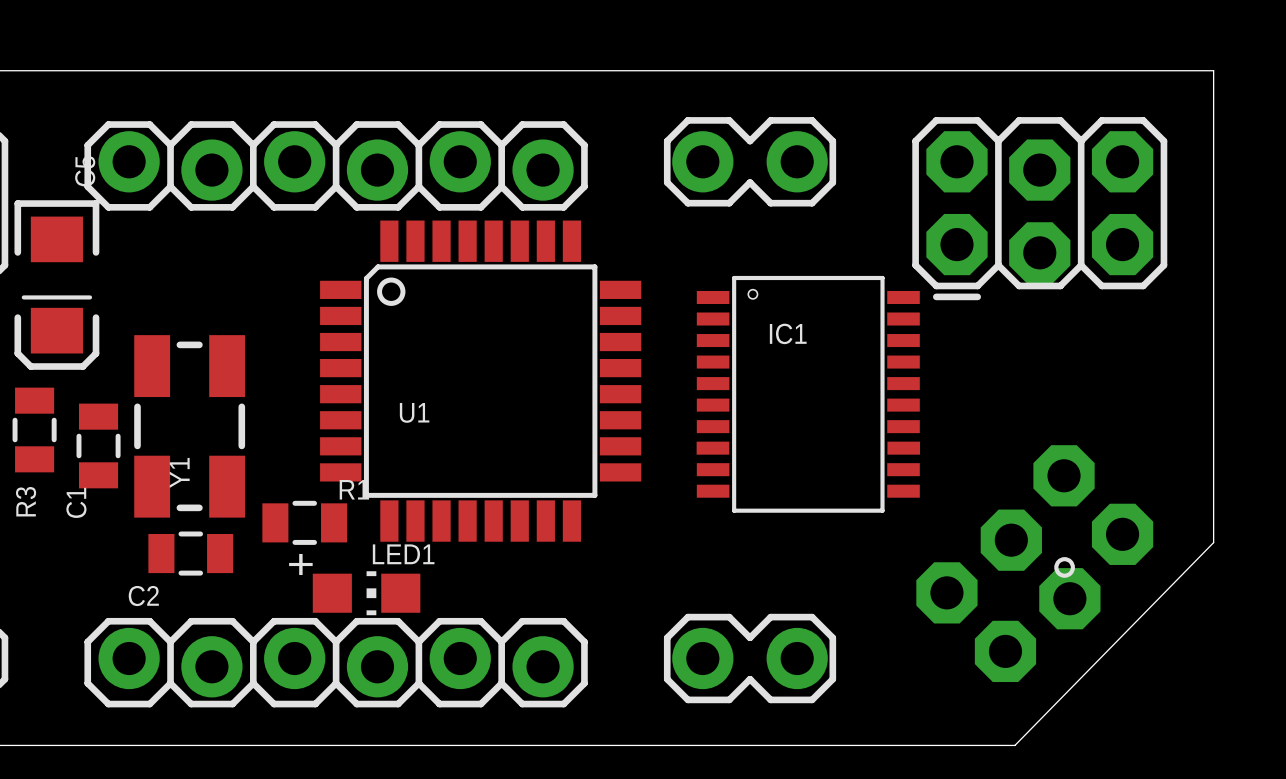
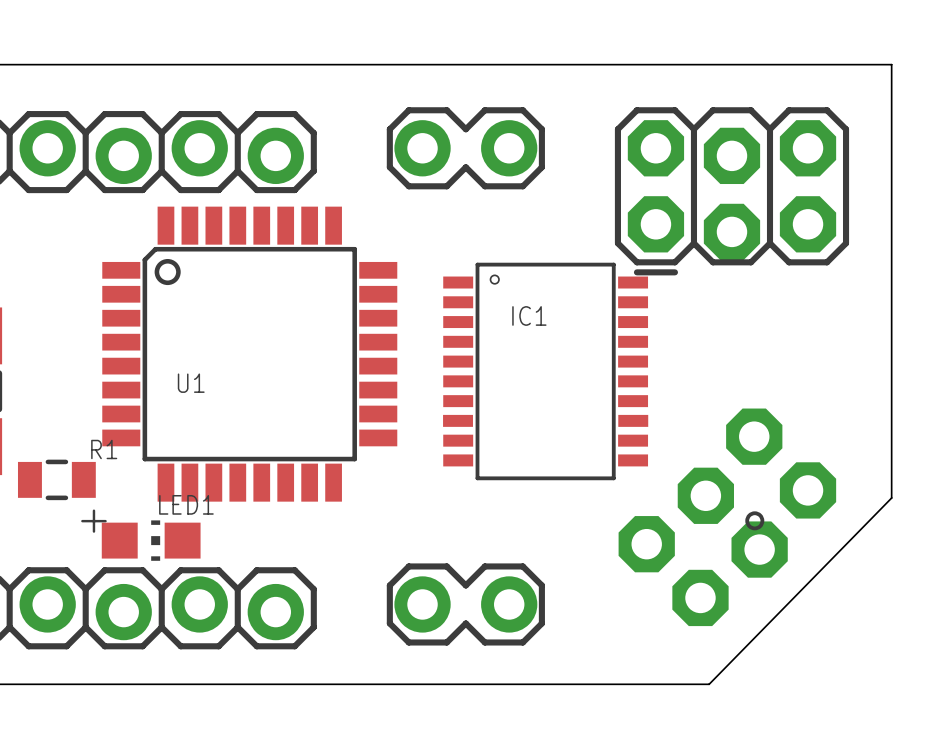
U1 position: (480, 381) -> (249, 354)
IC1 position: (808, 394) -> (545, 371)
LED1 position: (366, 593) -> (151, 540)

